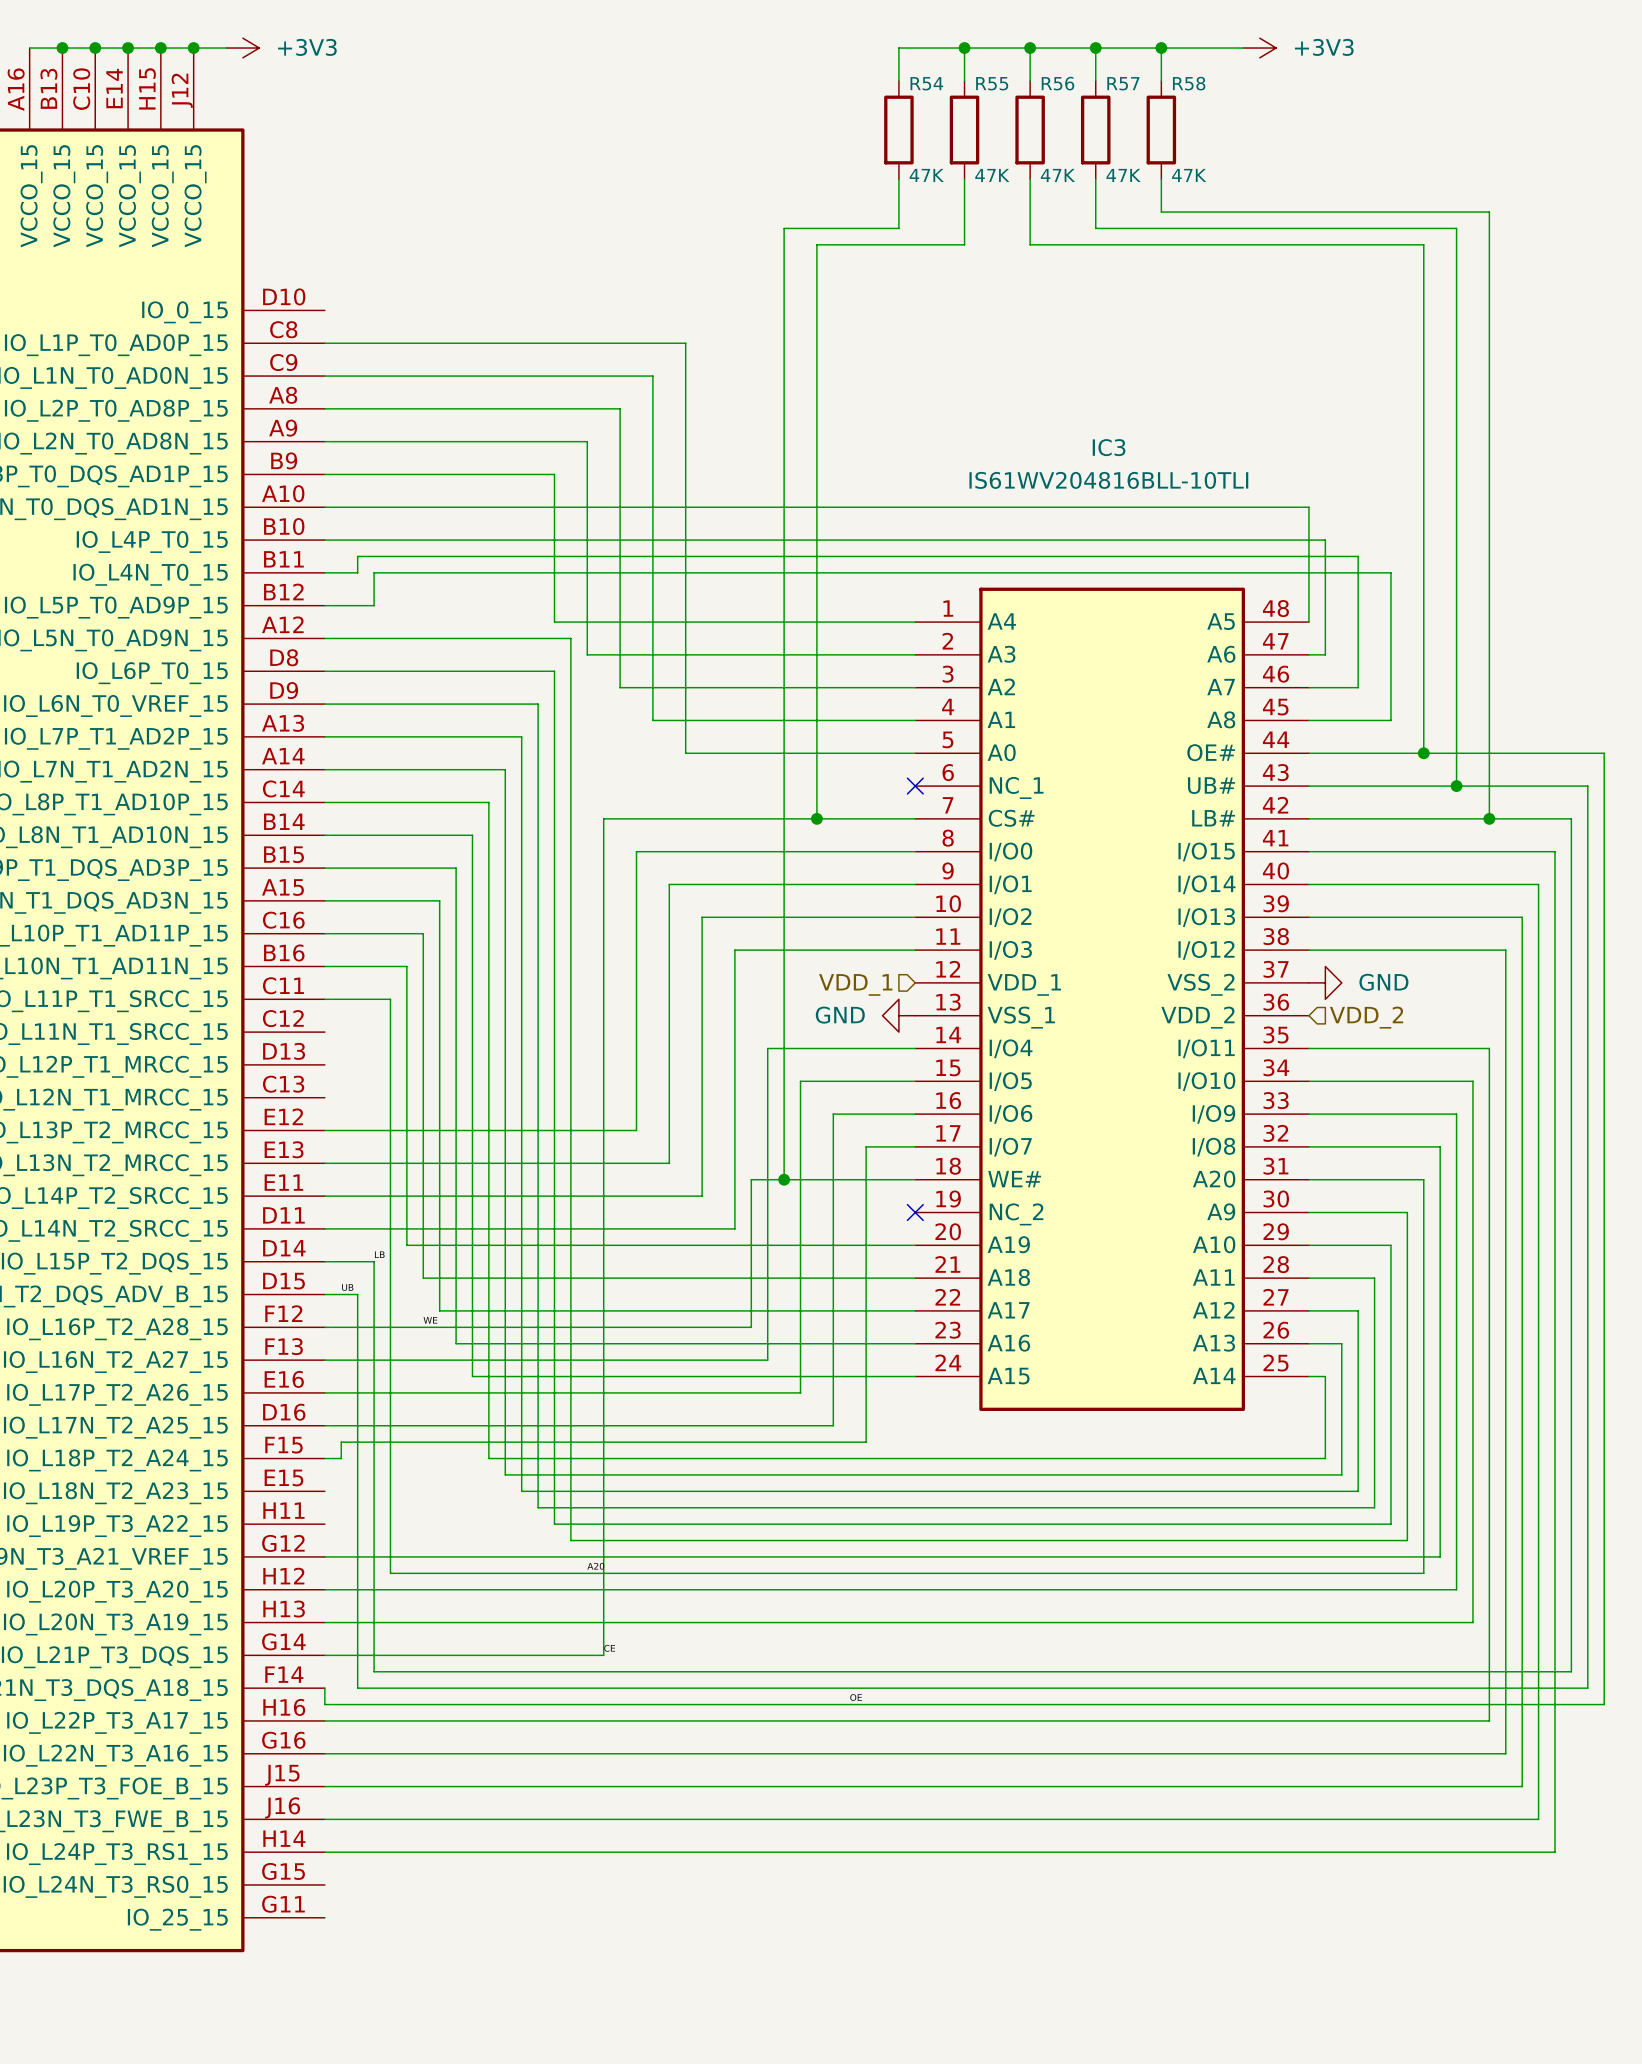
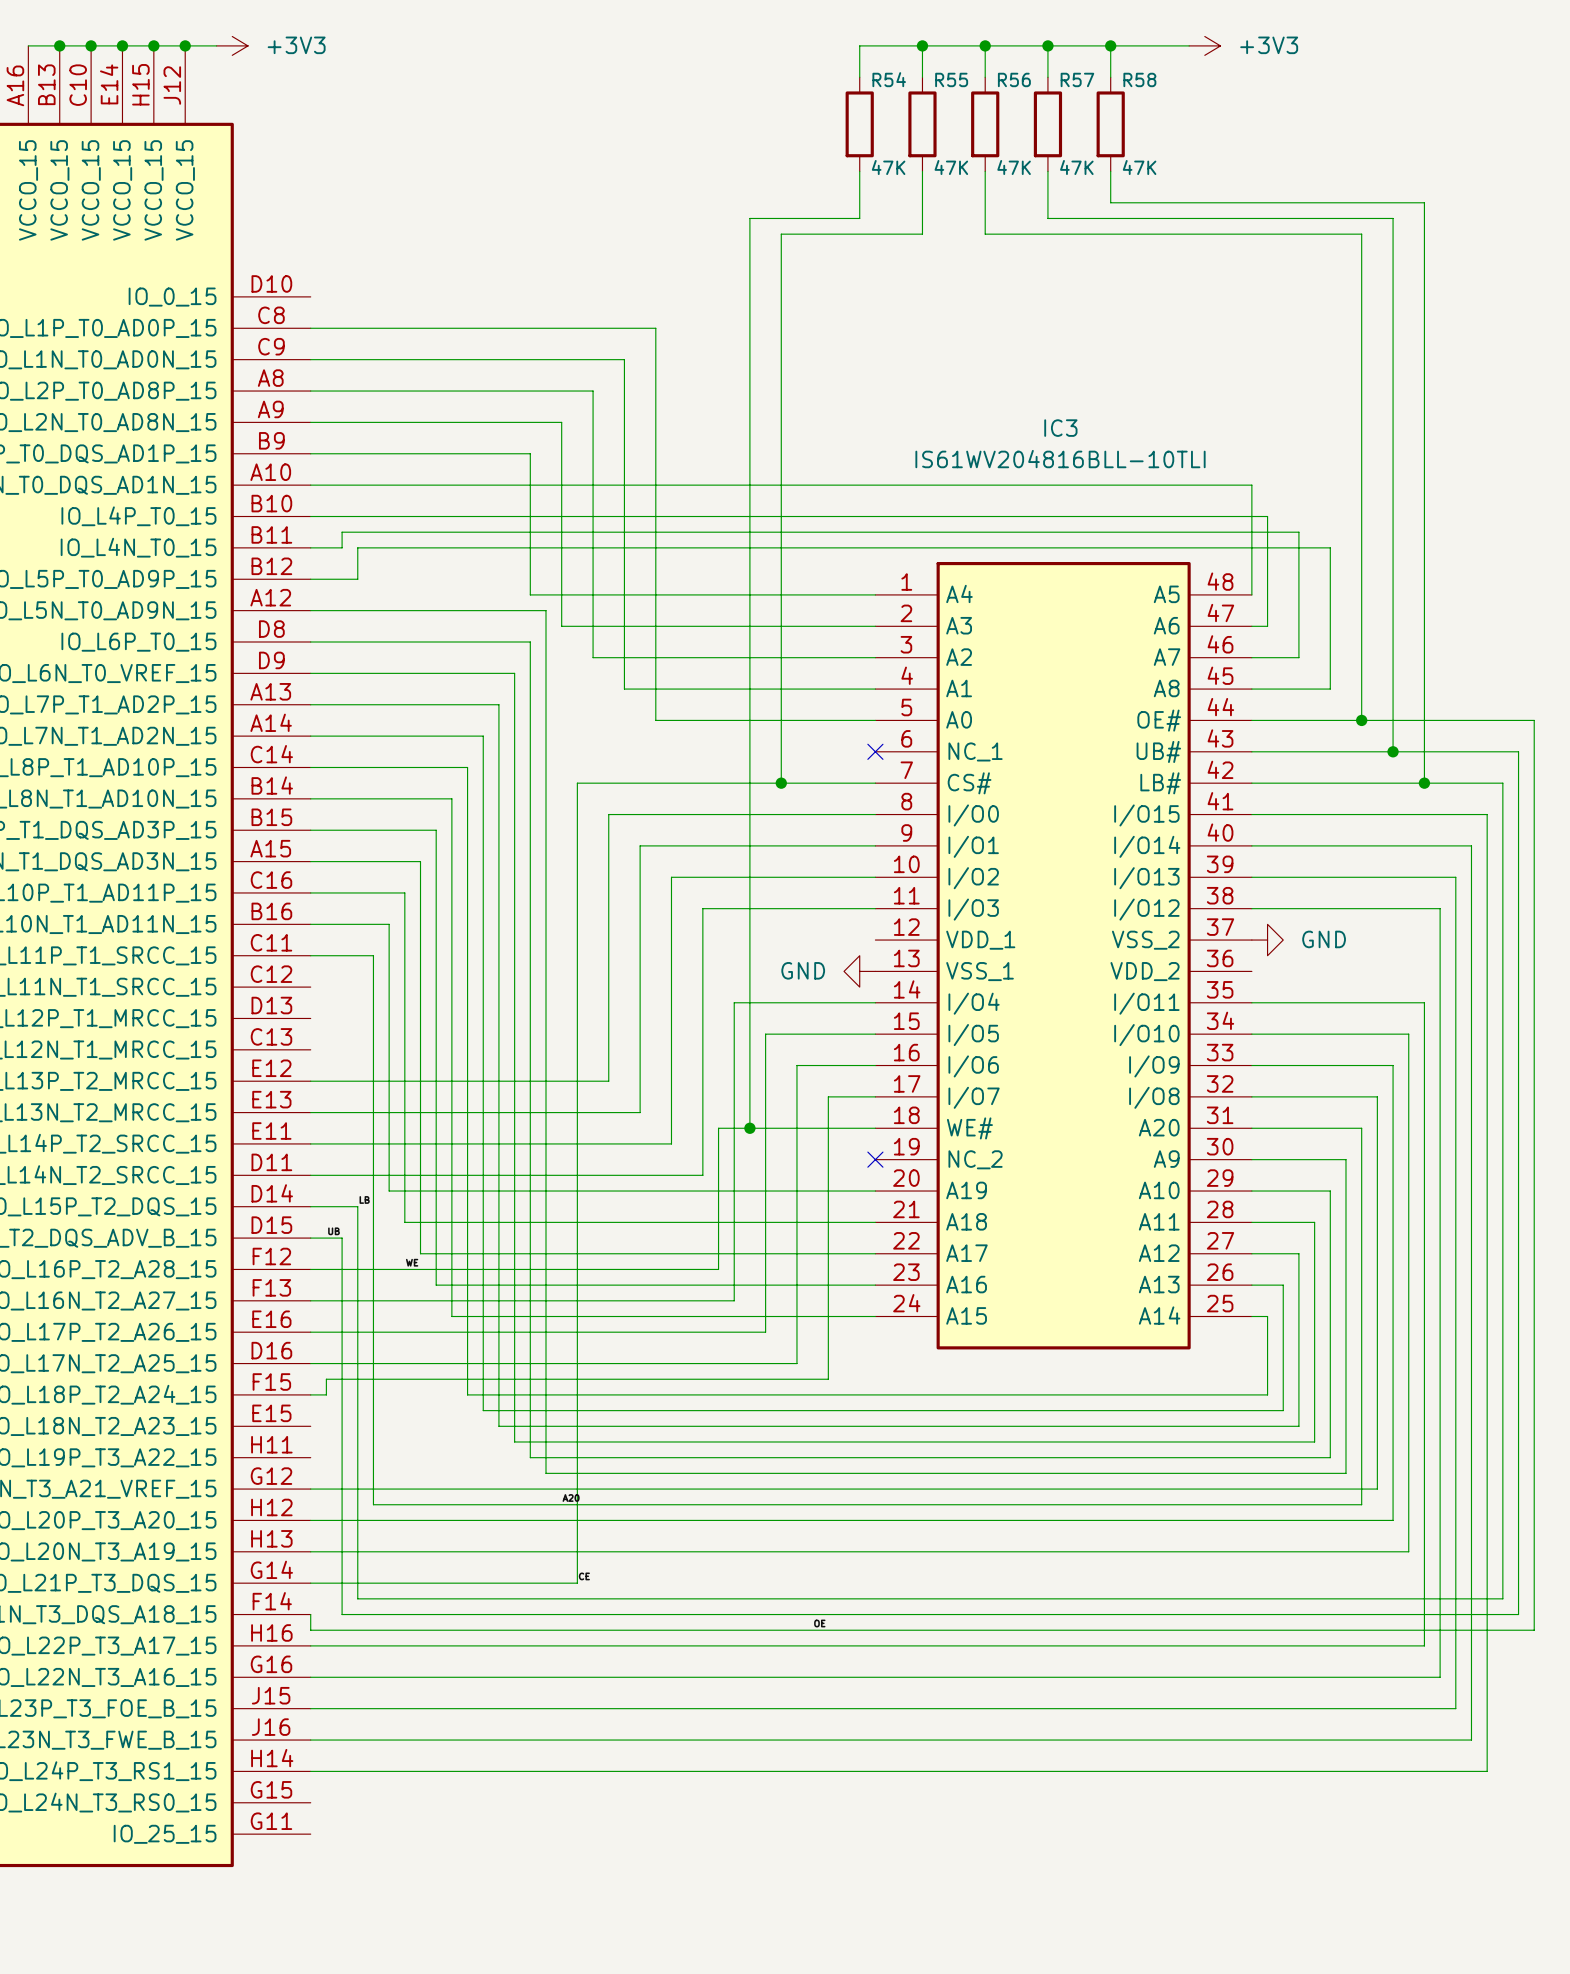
hierarchical label: VDD_1 (855, 984) -> none
hierarchical label: VDD_2 (1366, 1017) -> none

